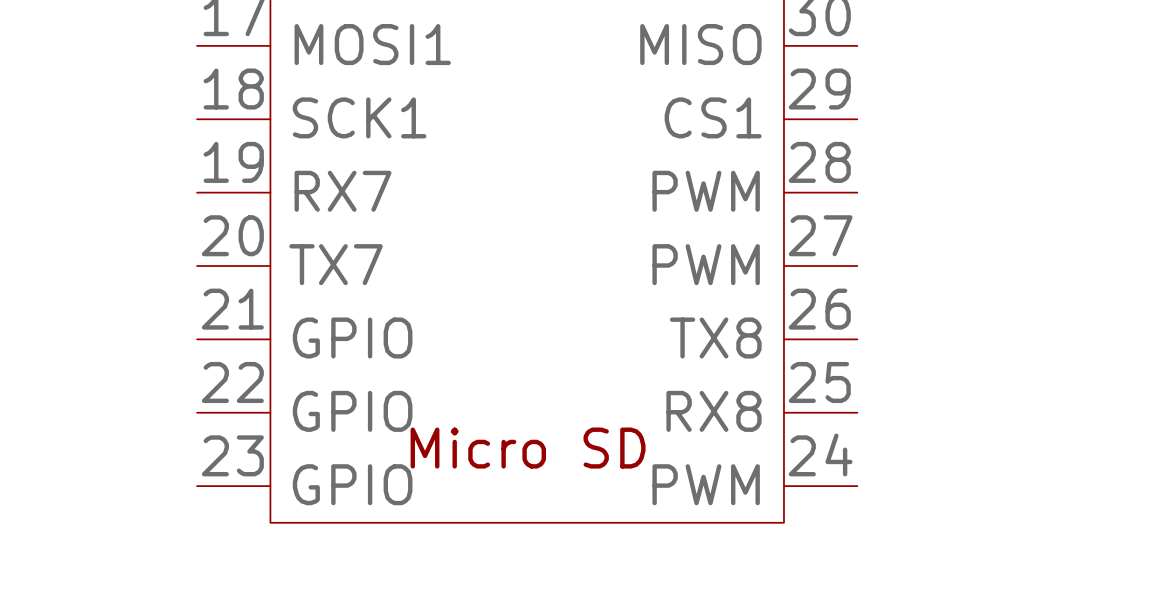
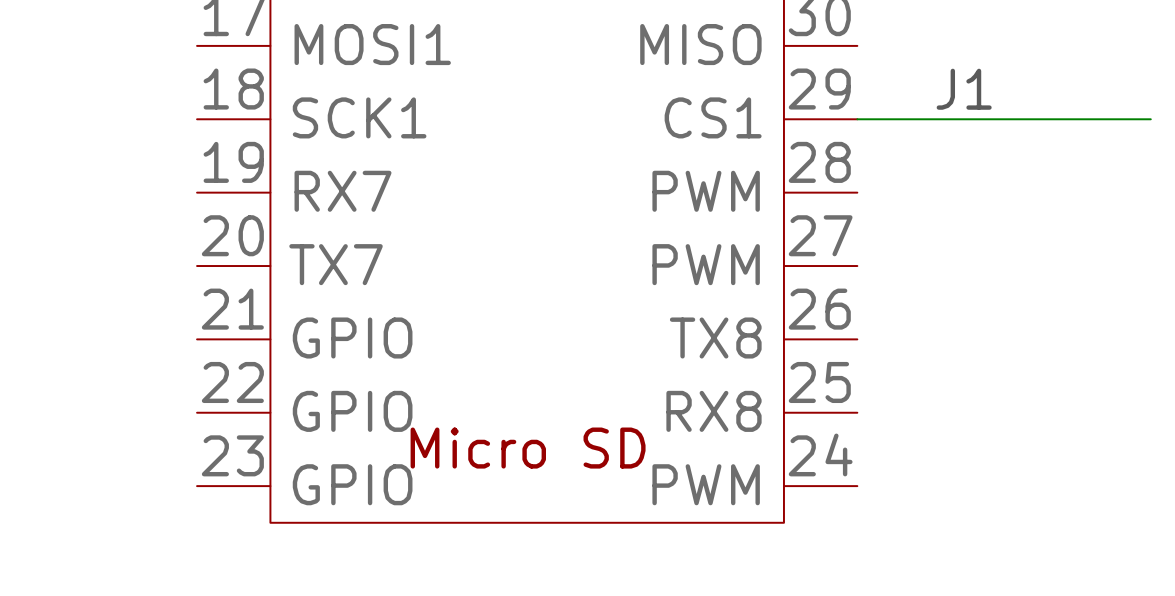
text: none -> J1 (964, 89)
wire: none -> (857, 119) (1150, 119)

